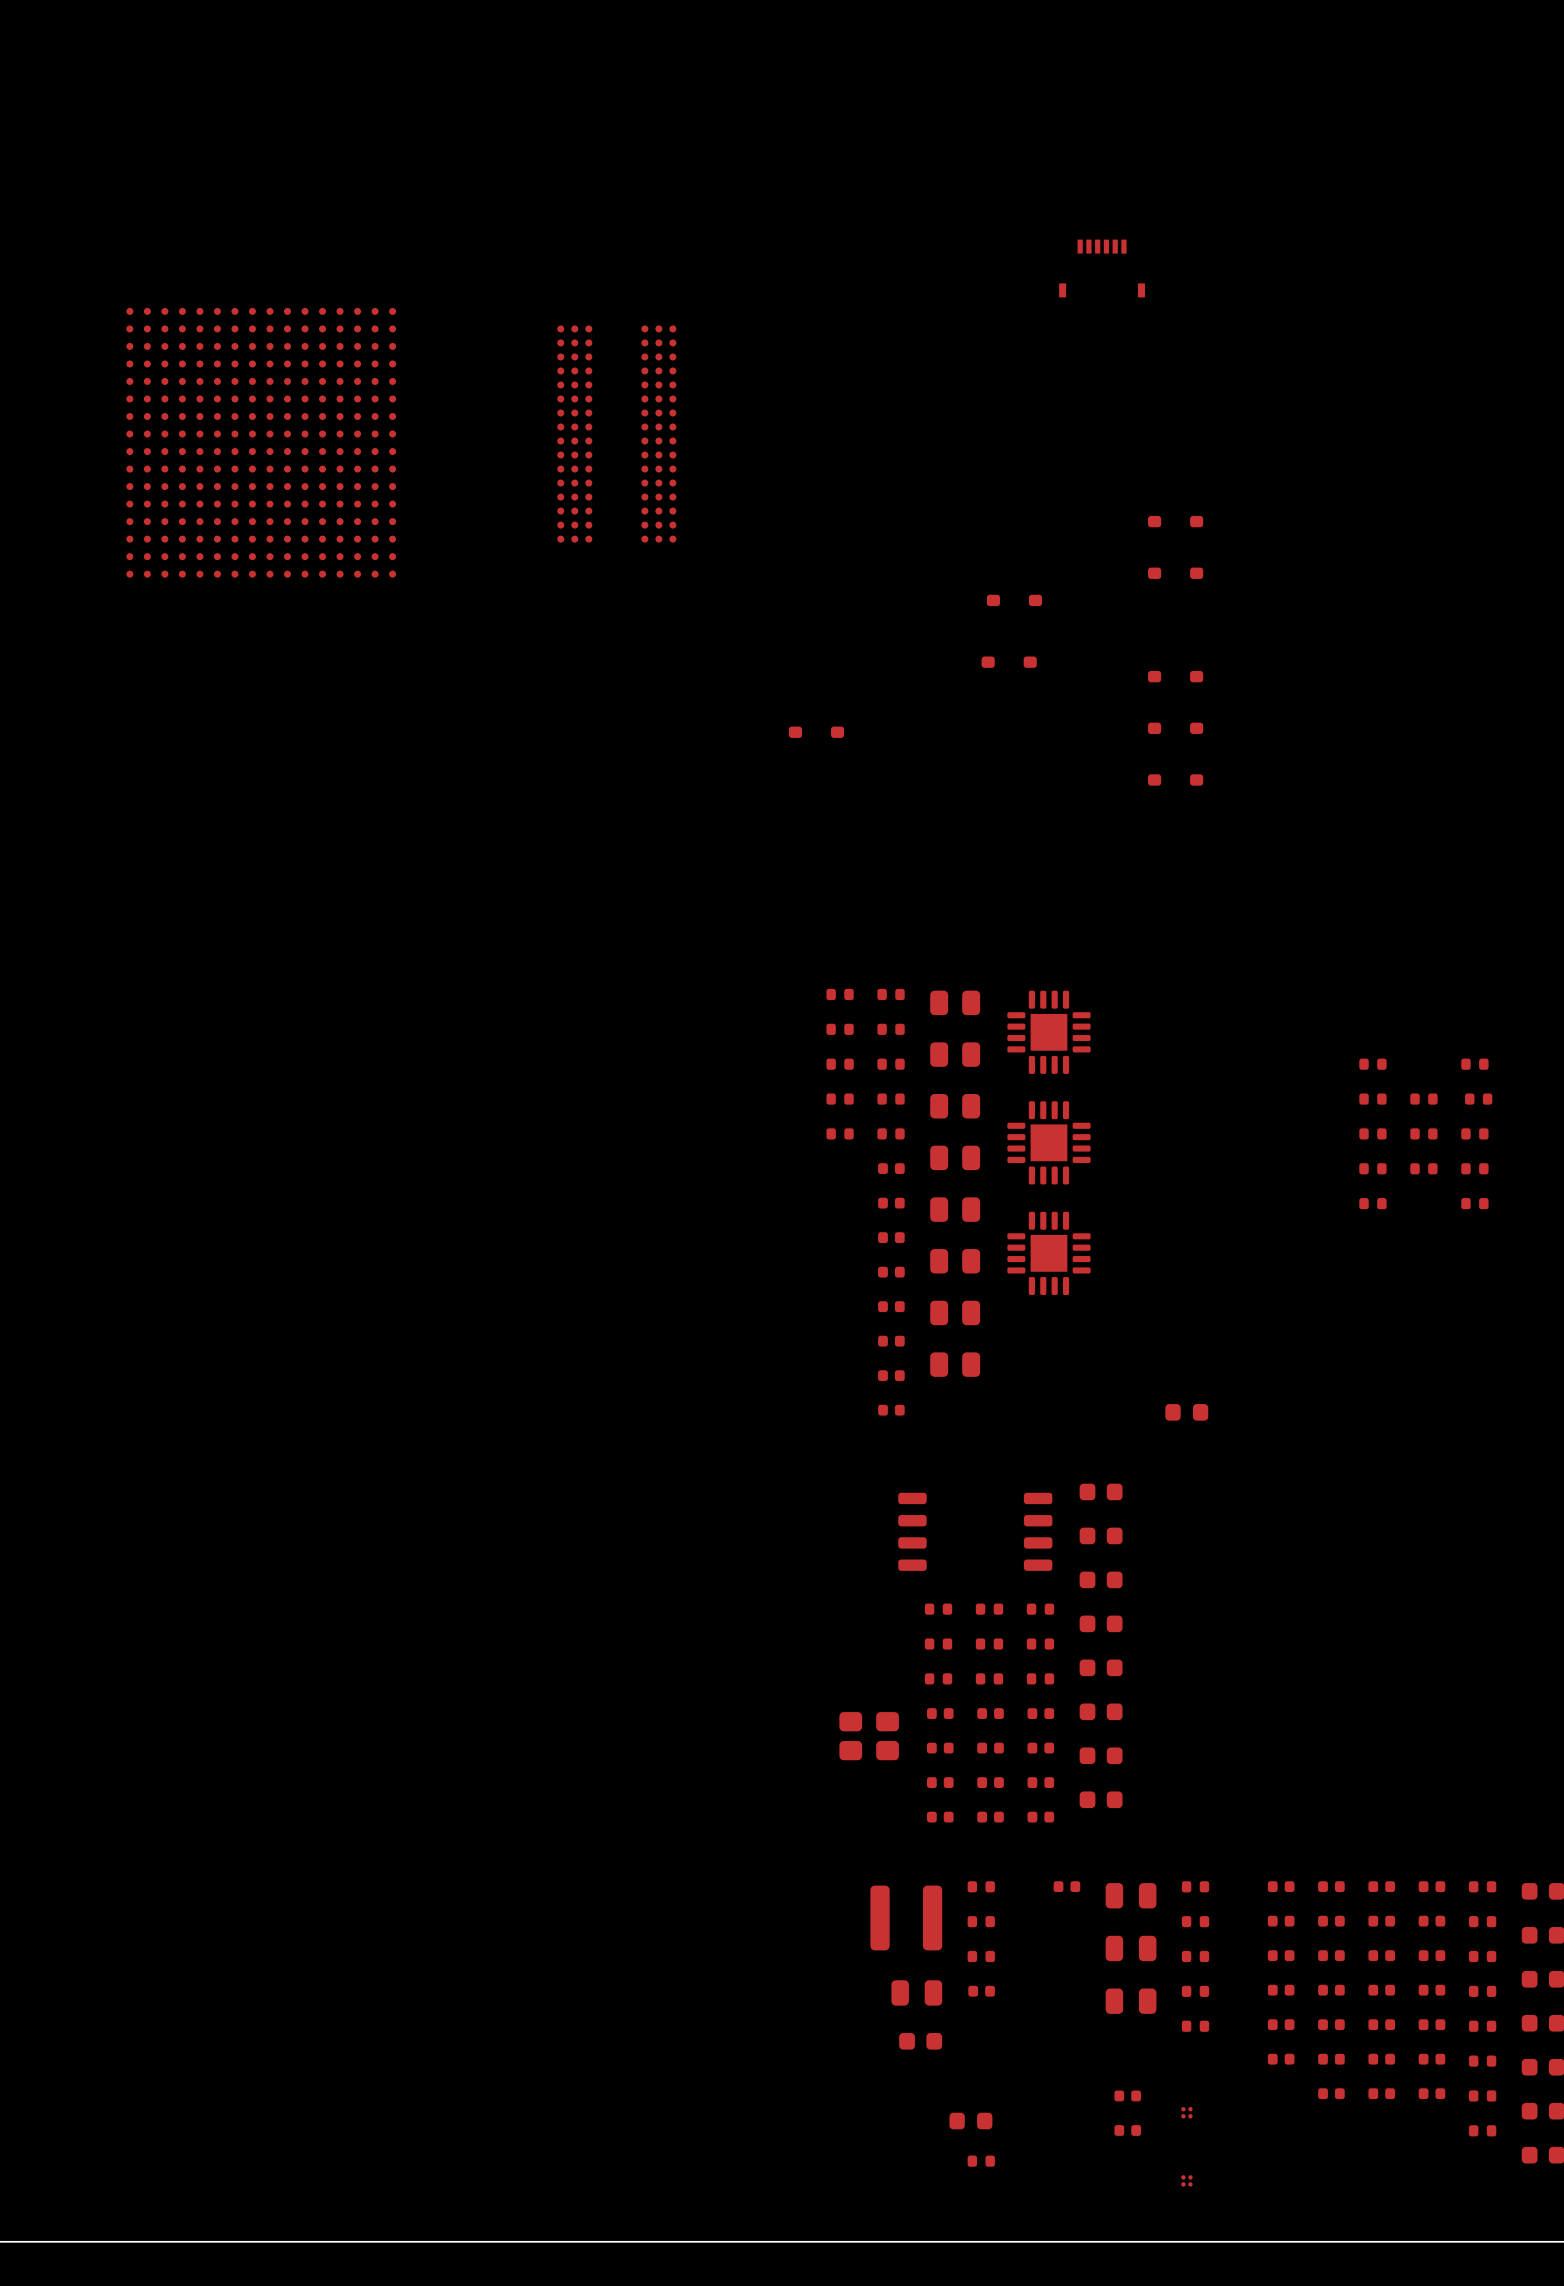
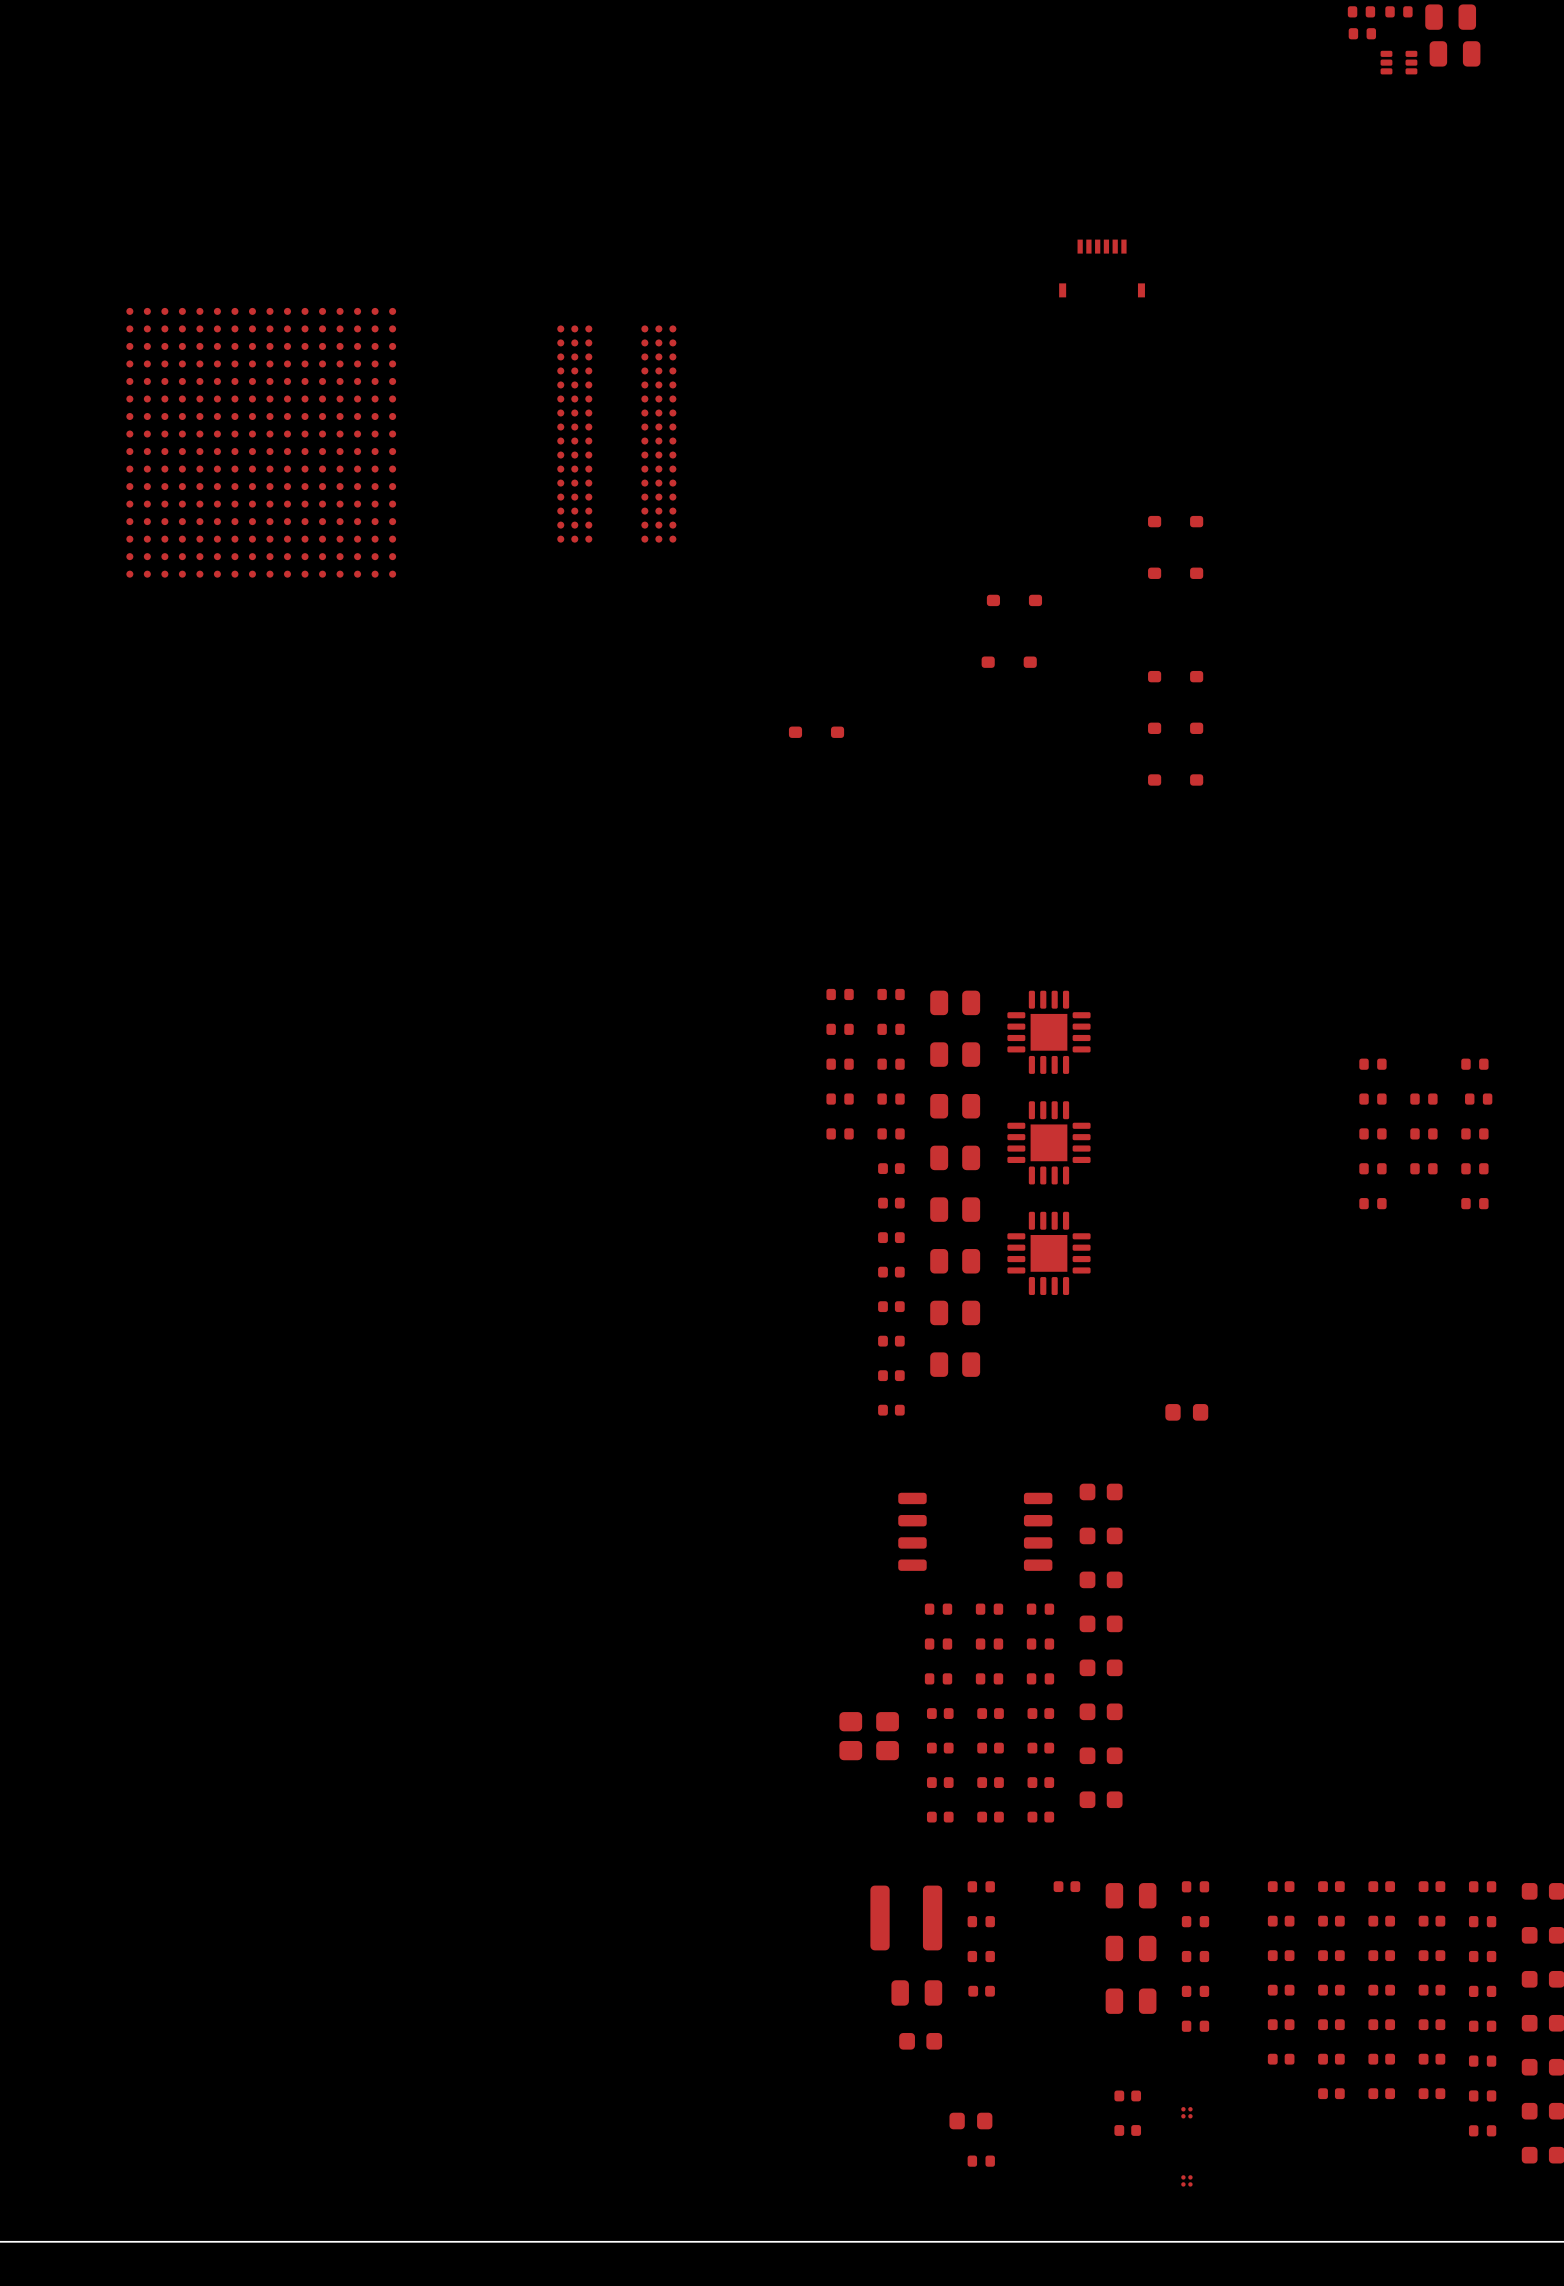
part: none -> (1361, 11)
part: none -> (1398, 11)
part: none -> (1450, 17)
part: none -> (1362, 33)
part: none -> (1455, 53)
part: none -> (1398, 62)

